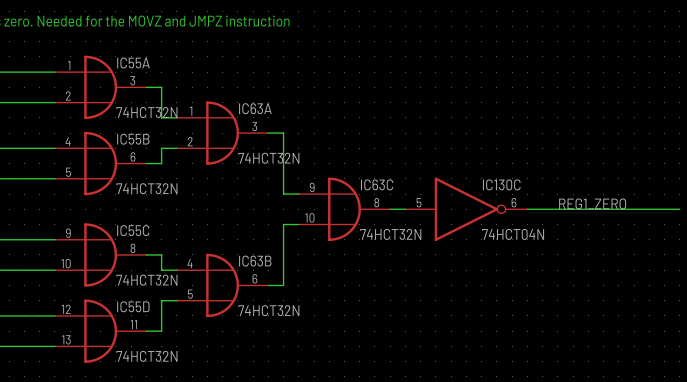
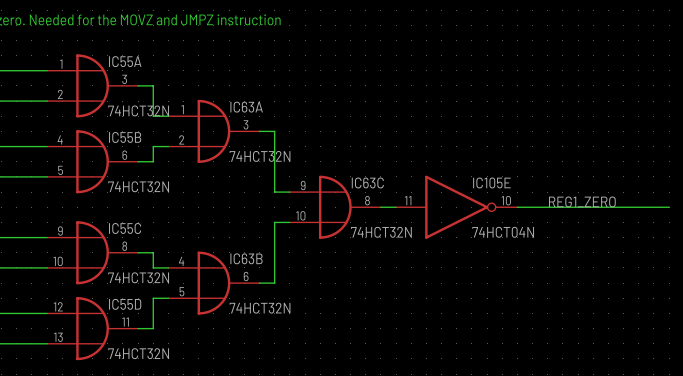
IC130C name: IC130C (501, 184) -> IC105E (491, 182)
IC130C pin number: 5 (419, 202) -> 11 (408, 200)
IC130C pin number: 6 (513, 202) -> 10 (506, 200)

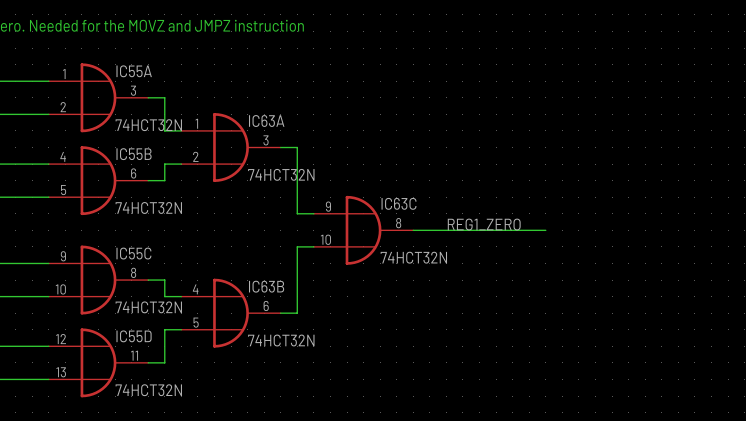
label position: REG1_ZERO (582, 201) -> REG1_ZERO (484, 224)
wire: none -> (429, 230) (545, 230)
IC105E: 74HCT04N (456, 207) -> none
wire: (517, 207) (669, 207) -> none

